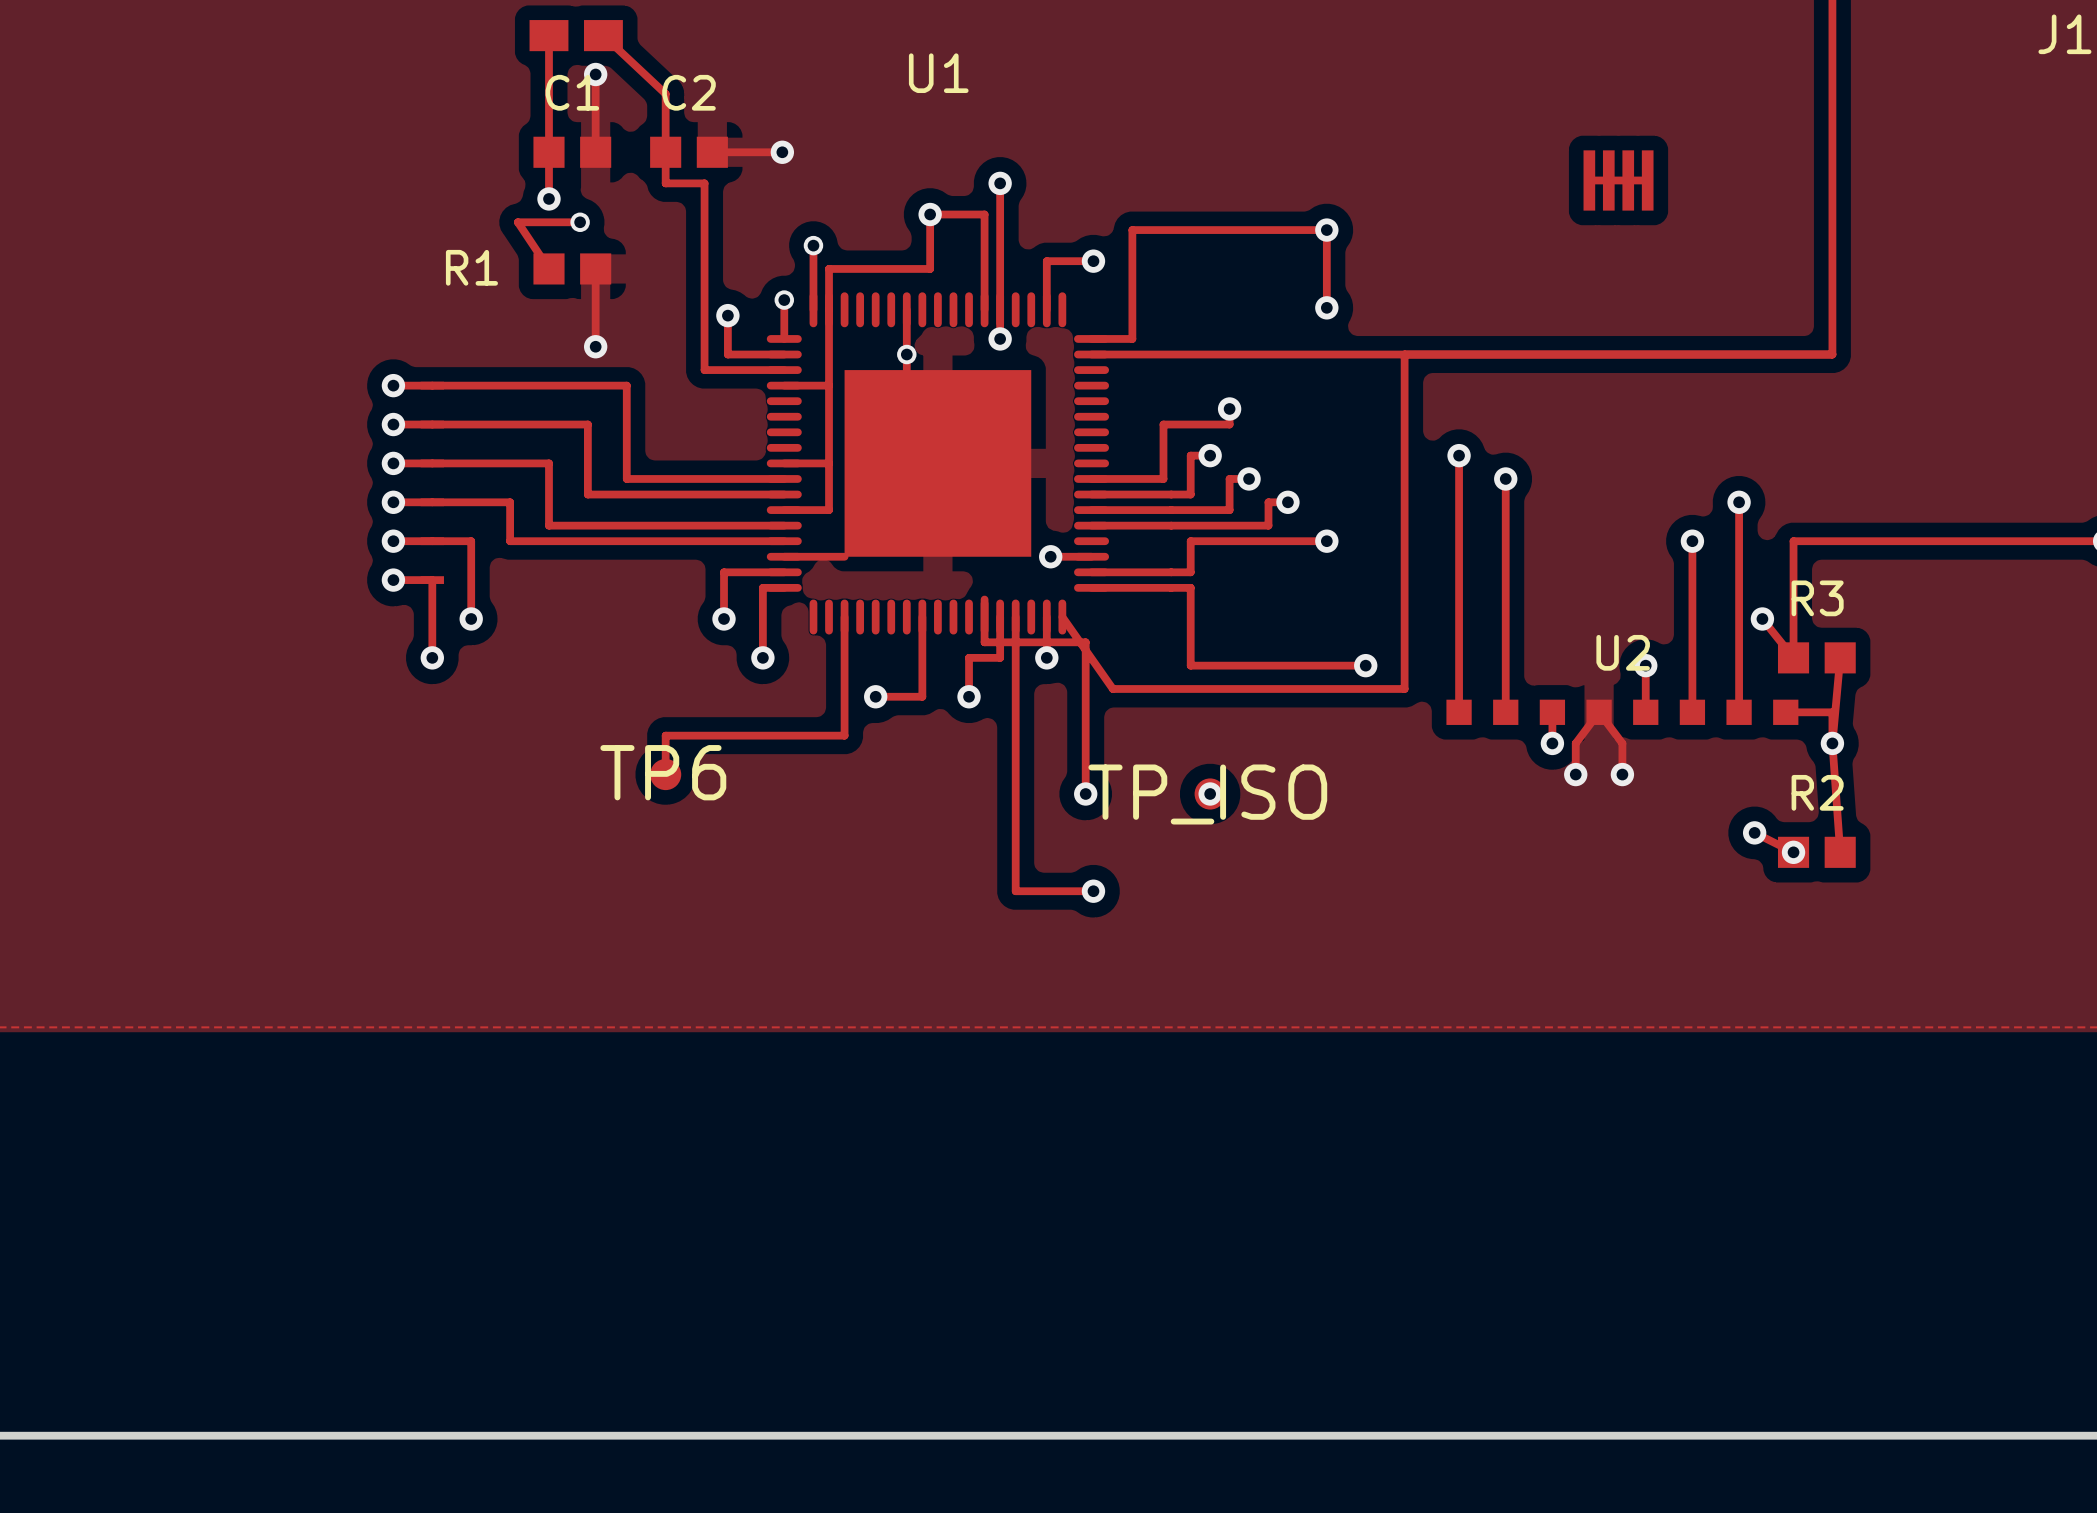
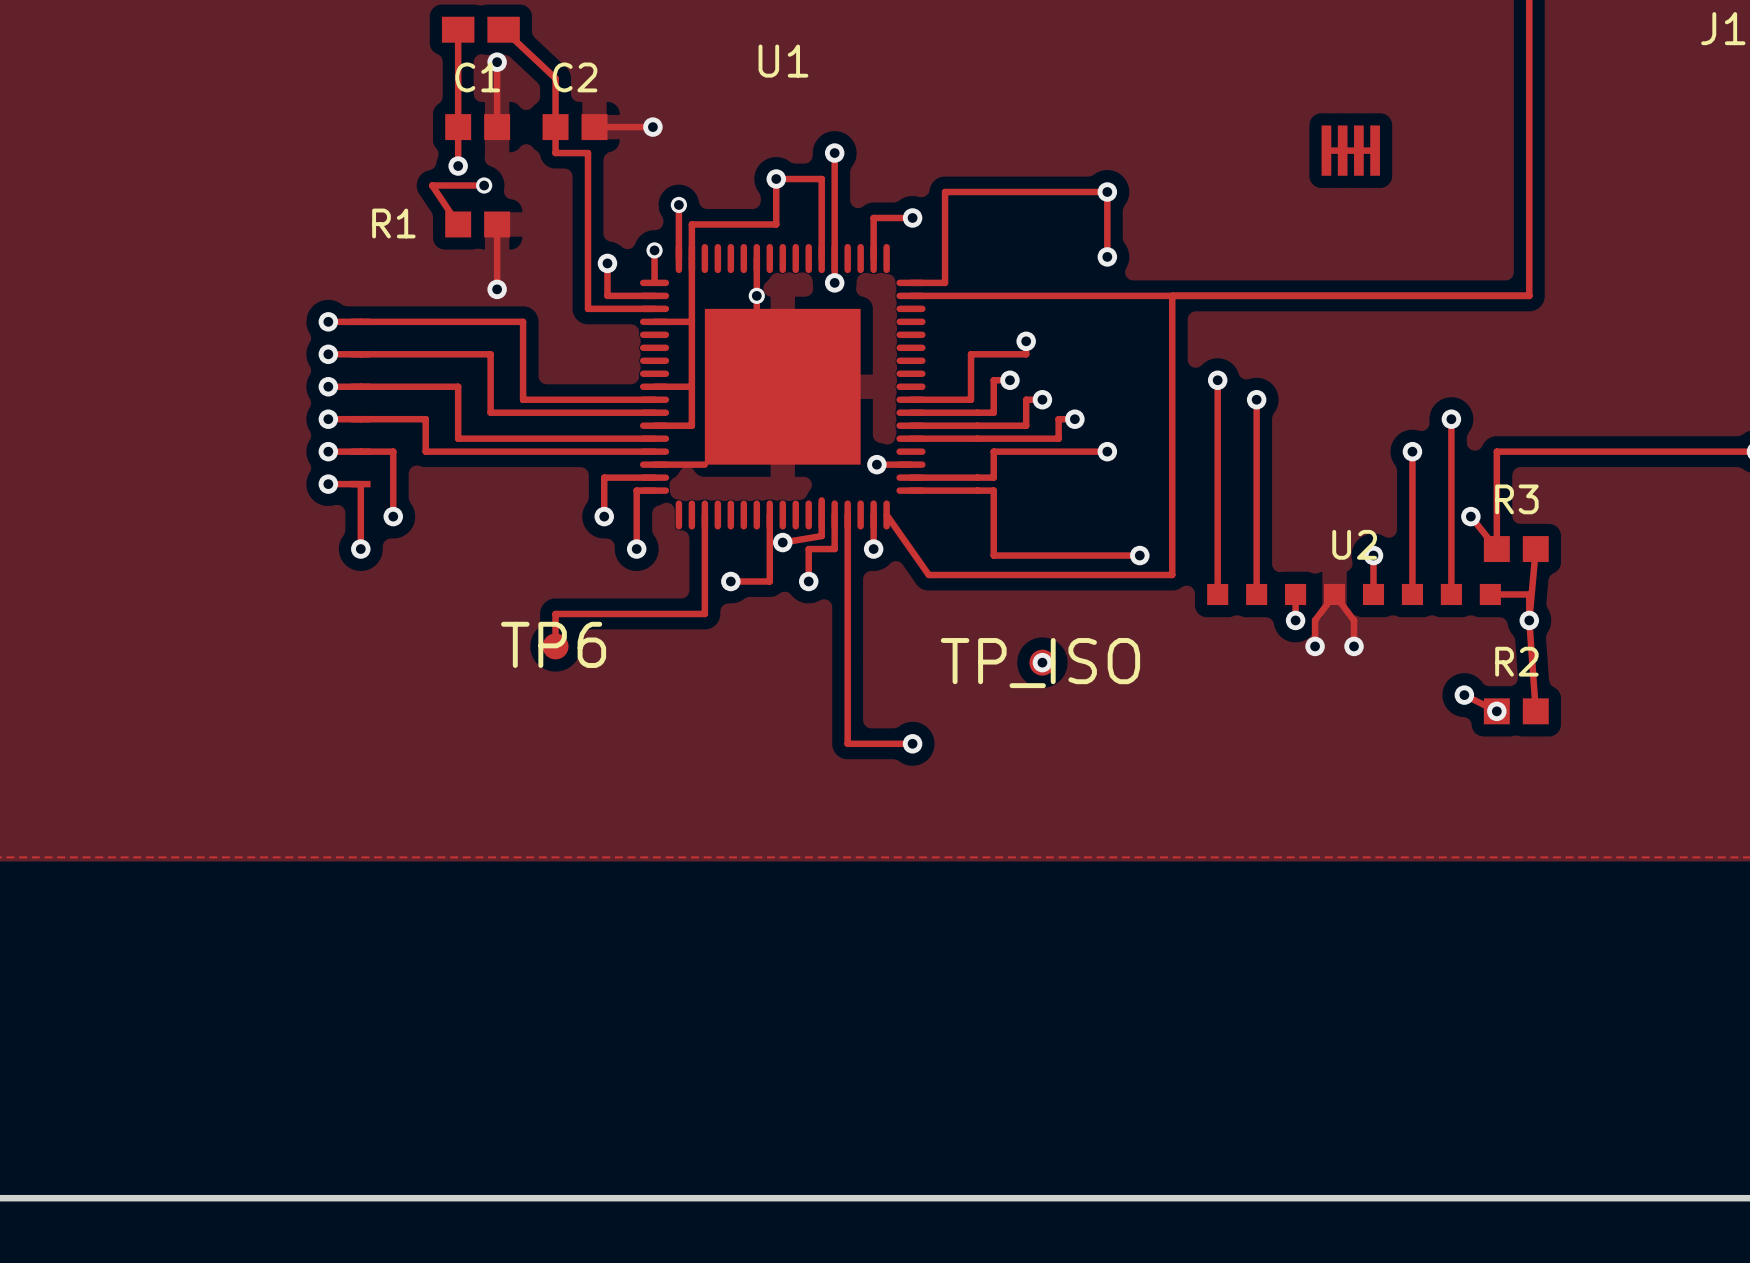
track: (984, 642) (1085, 642) (1085, 793) -> (821, 536) (782, 542)
via: none -> (782, 542)
via: (1085, 793) -> none
TP_ISO position: (1210, 793) -> (1042, 662)
via position: (1210, 793) -> (1042, 662)

